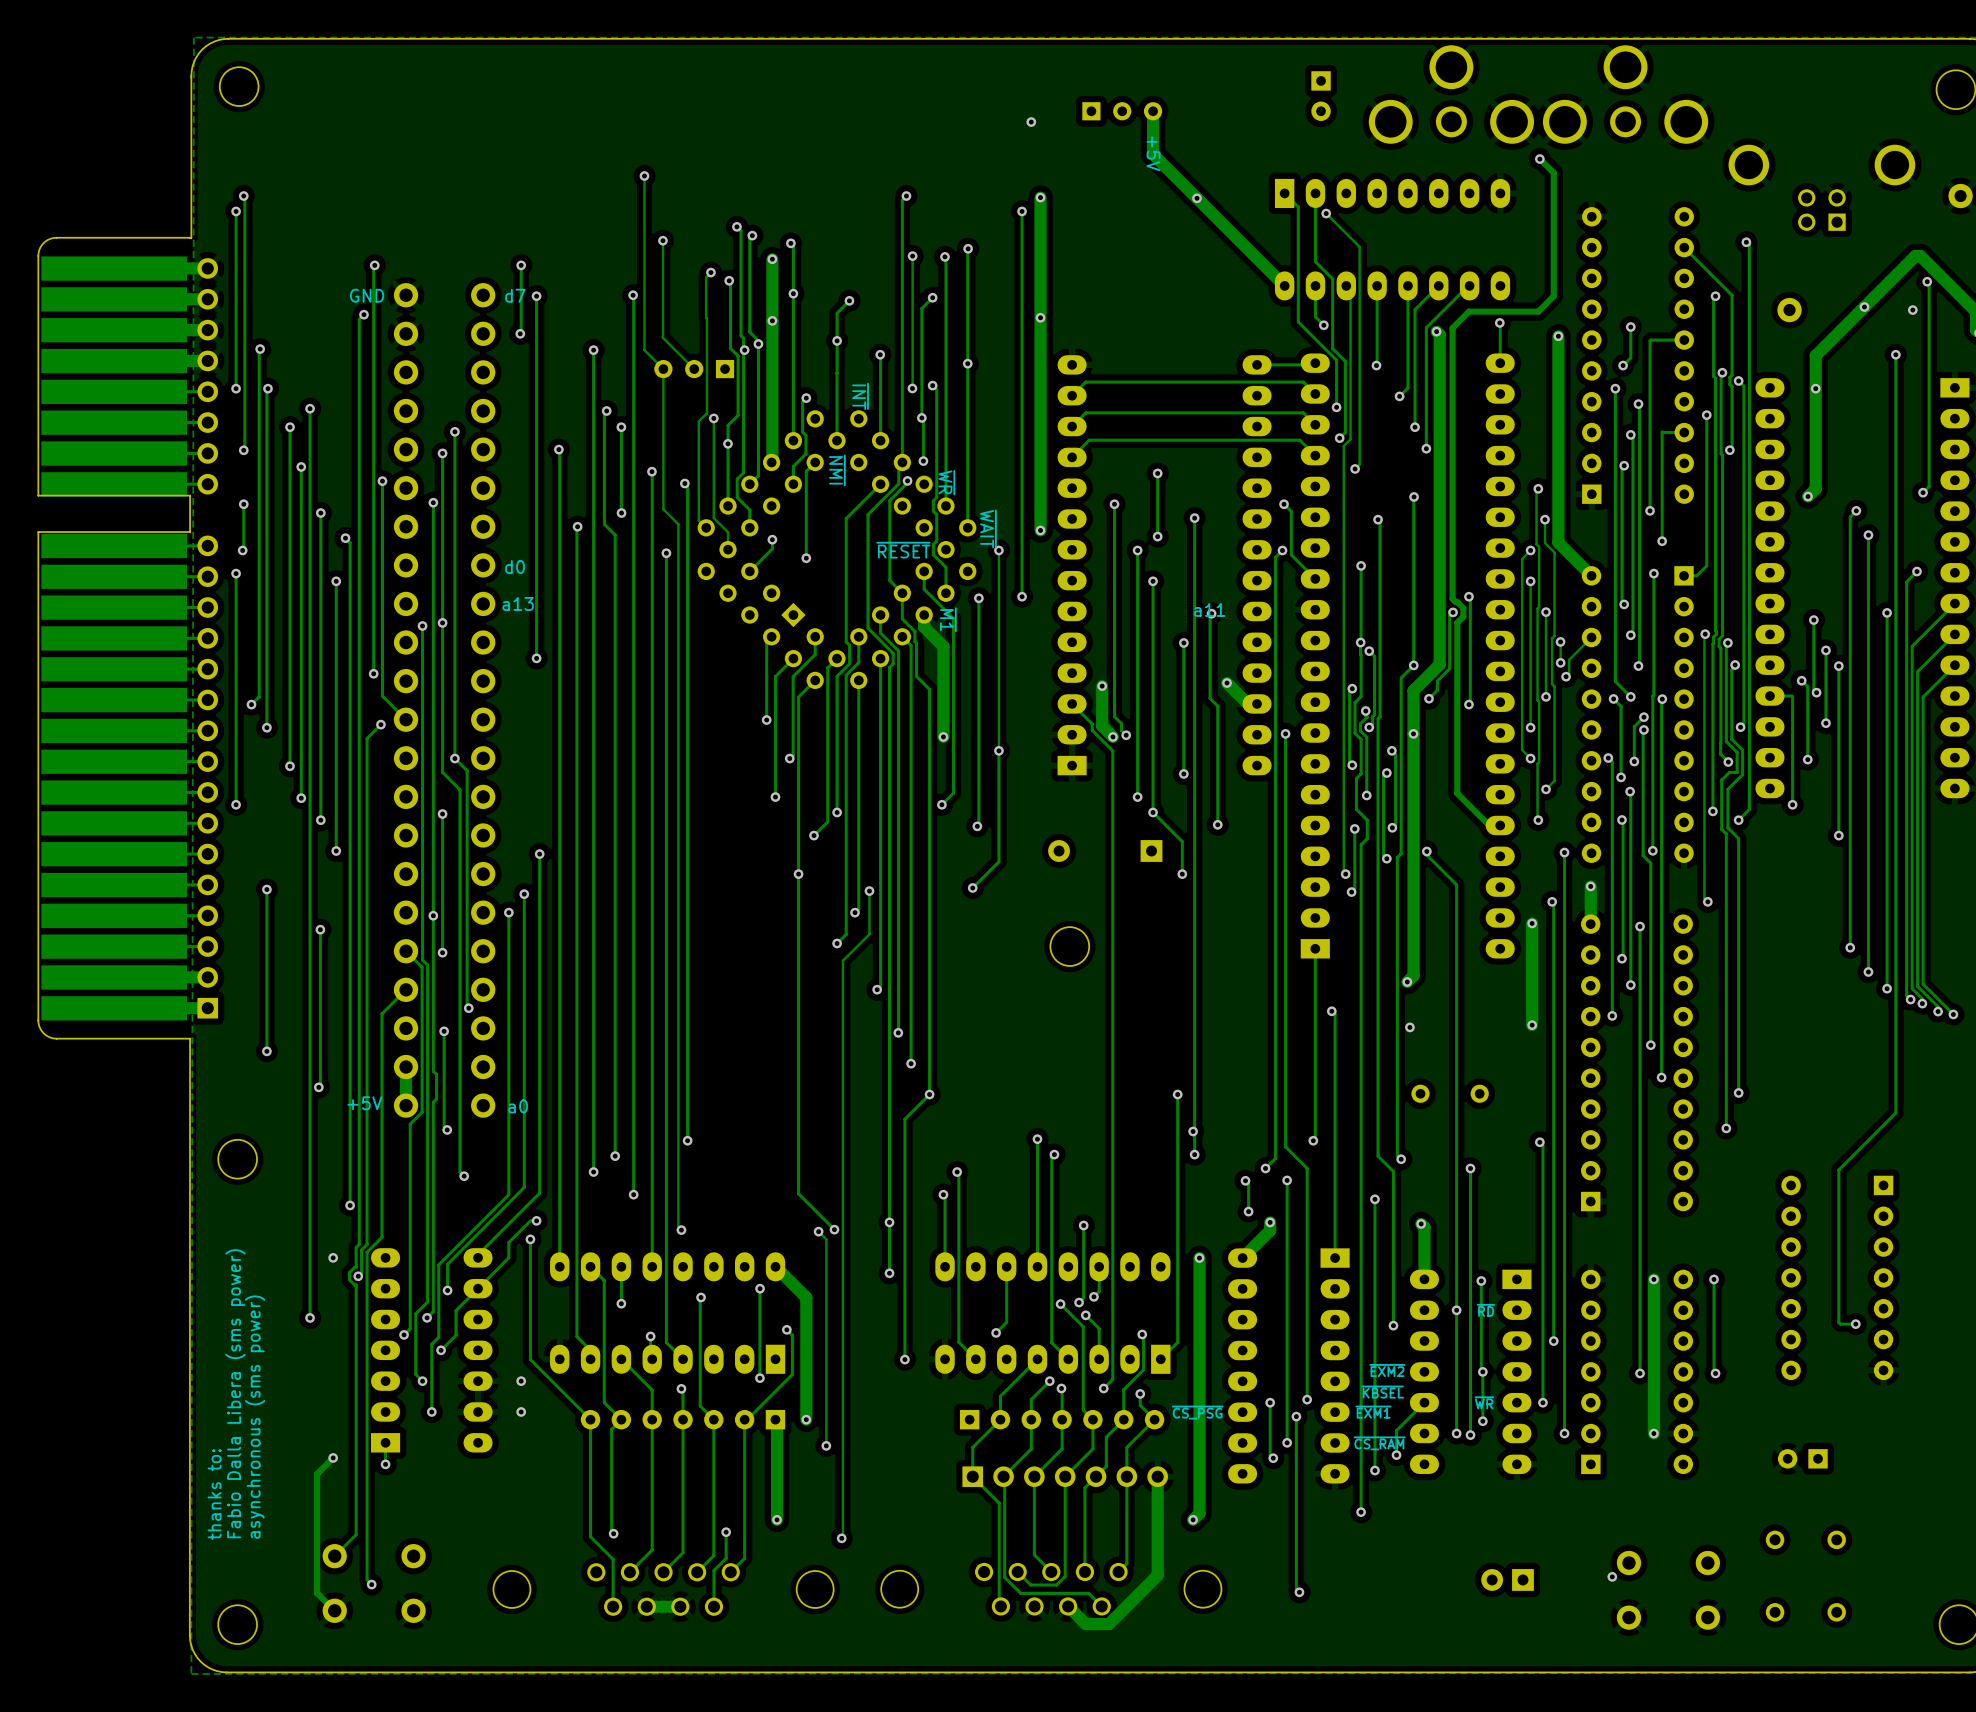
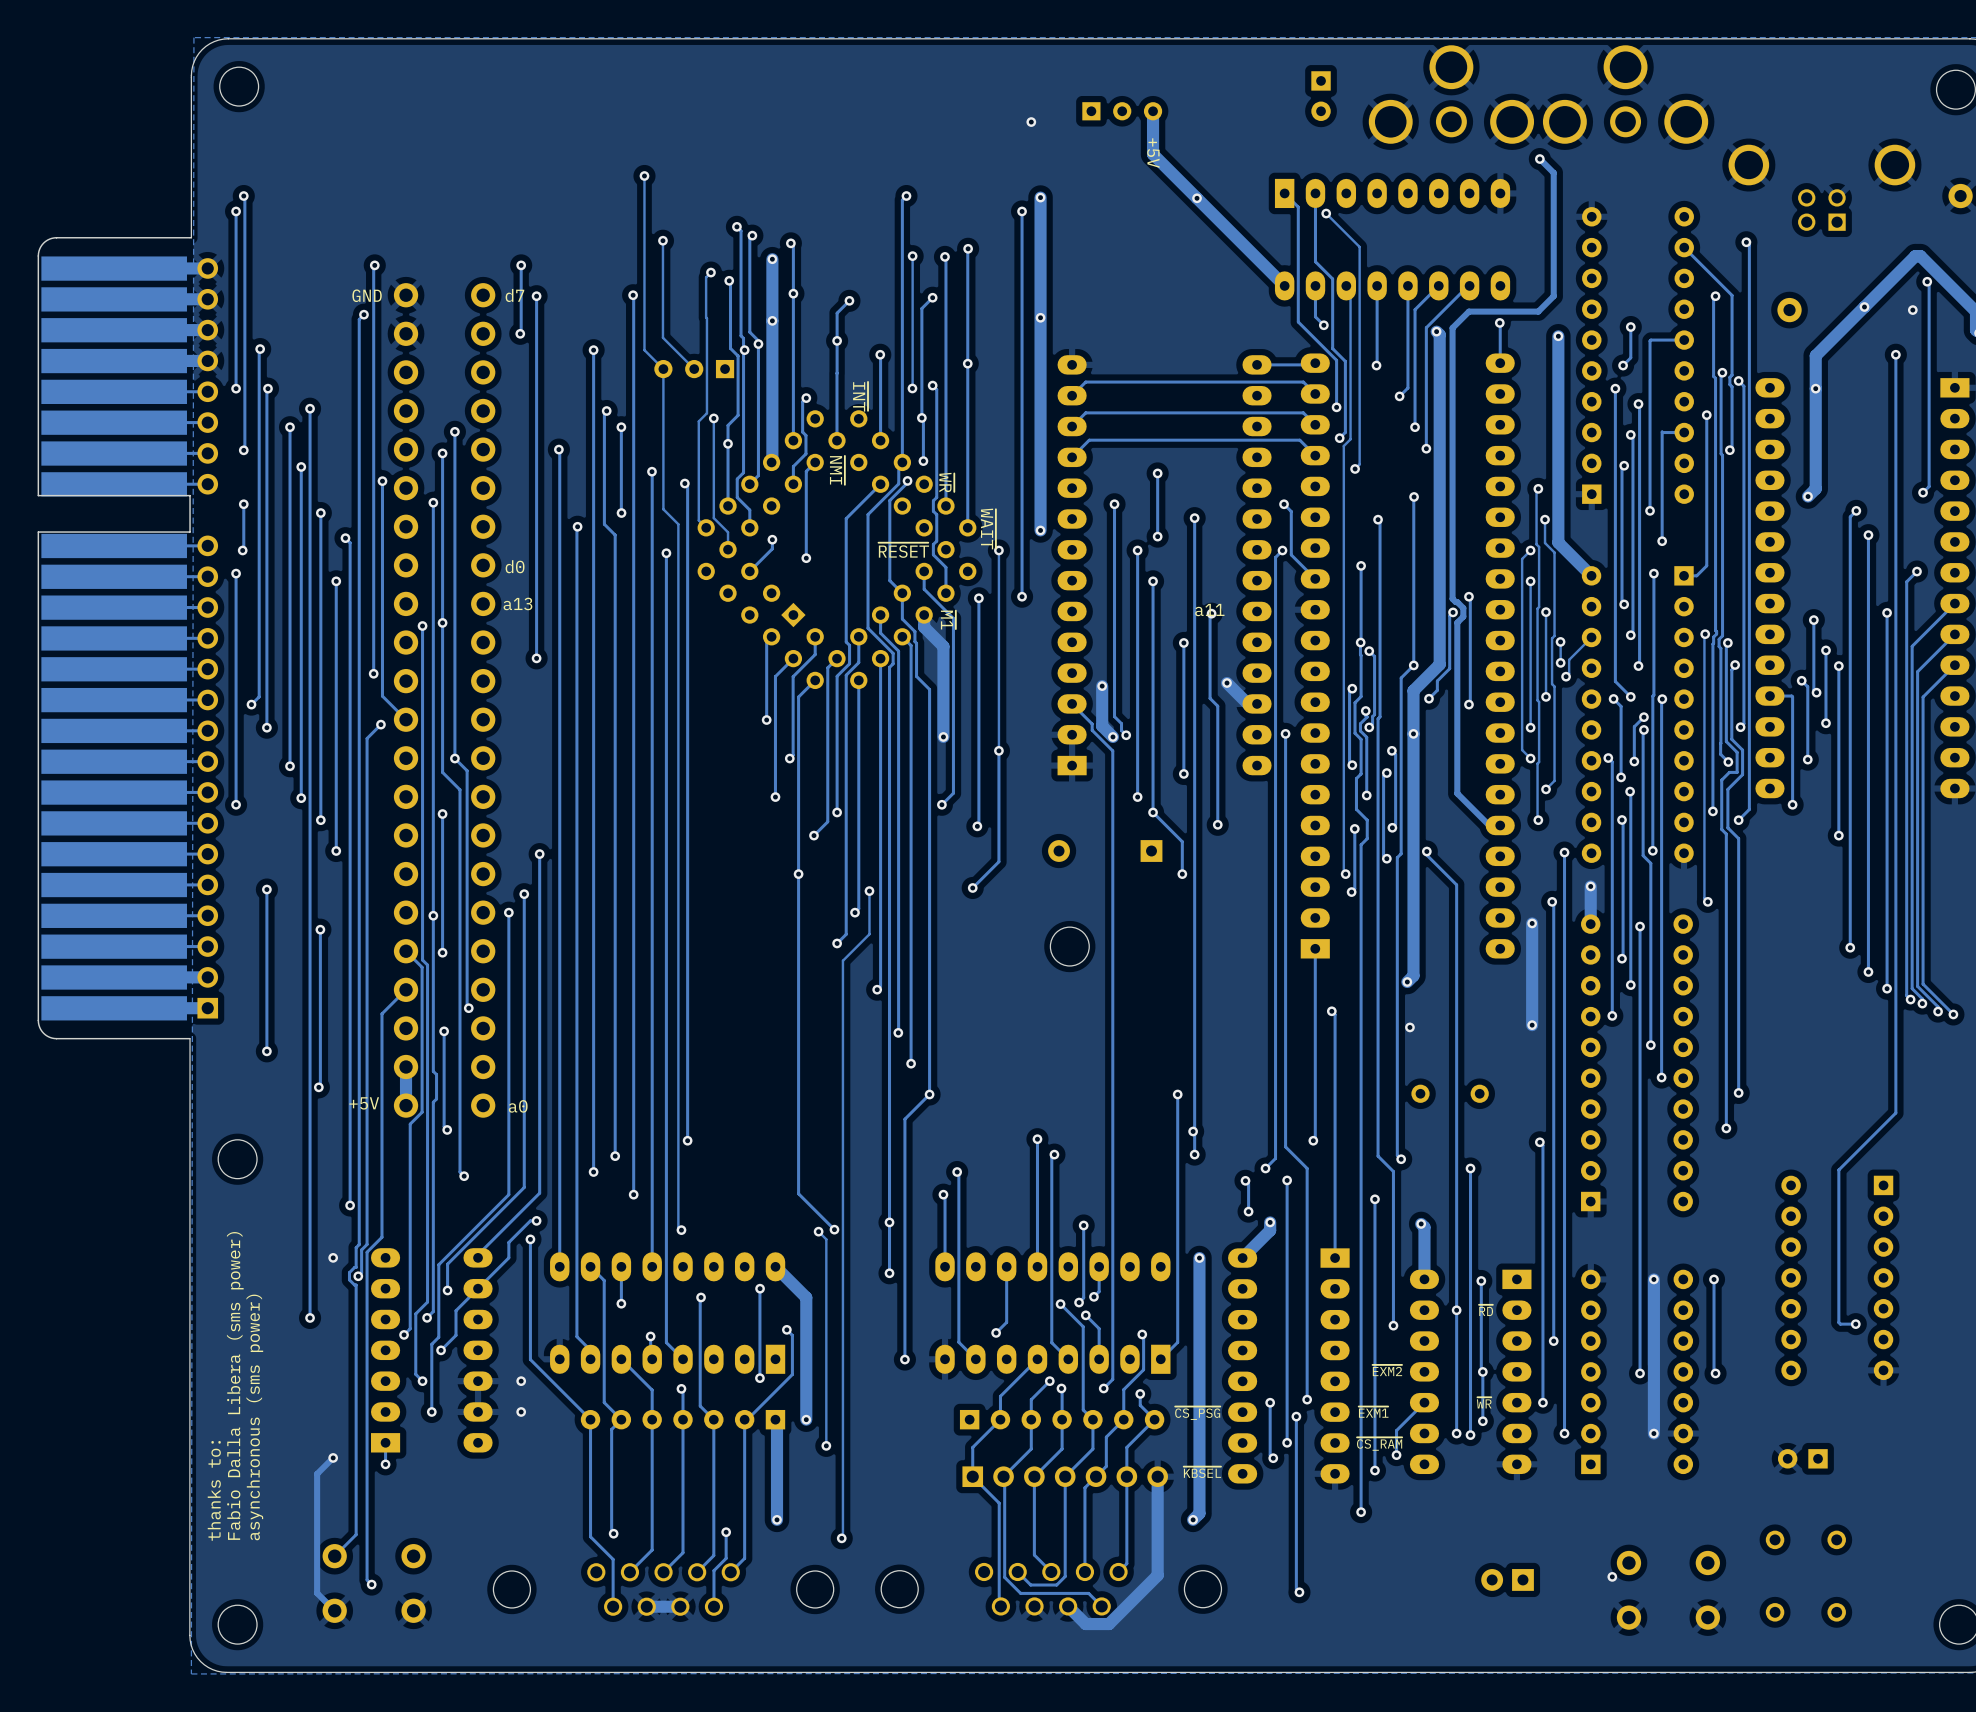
text position: ~{KBSEL} (1382, 1392) -> ~{KBSEL} (1202, 1472)

